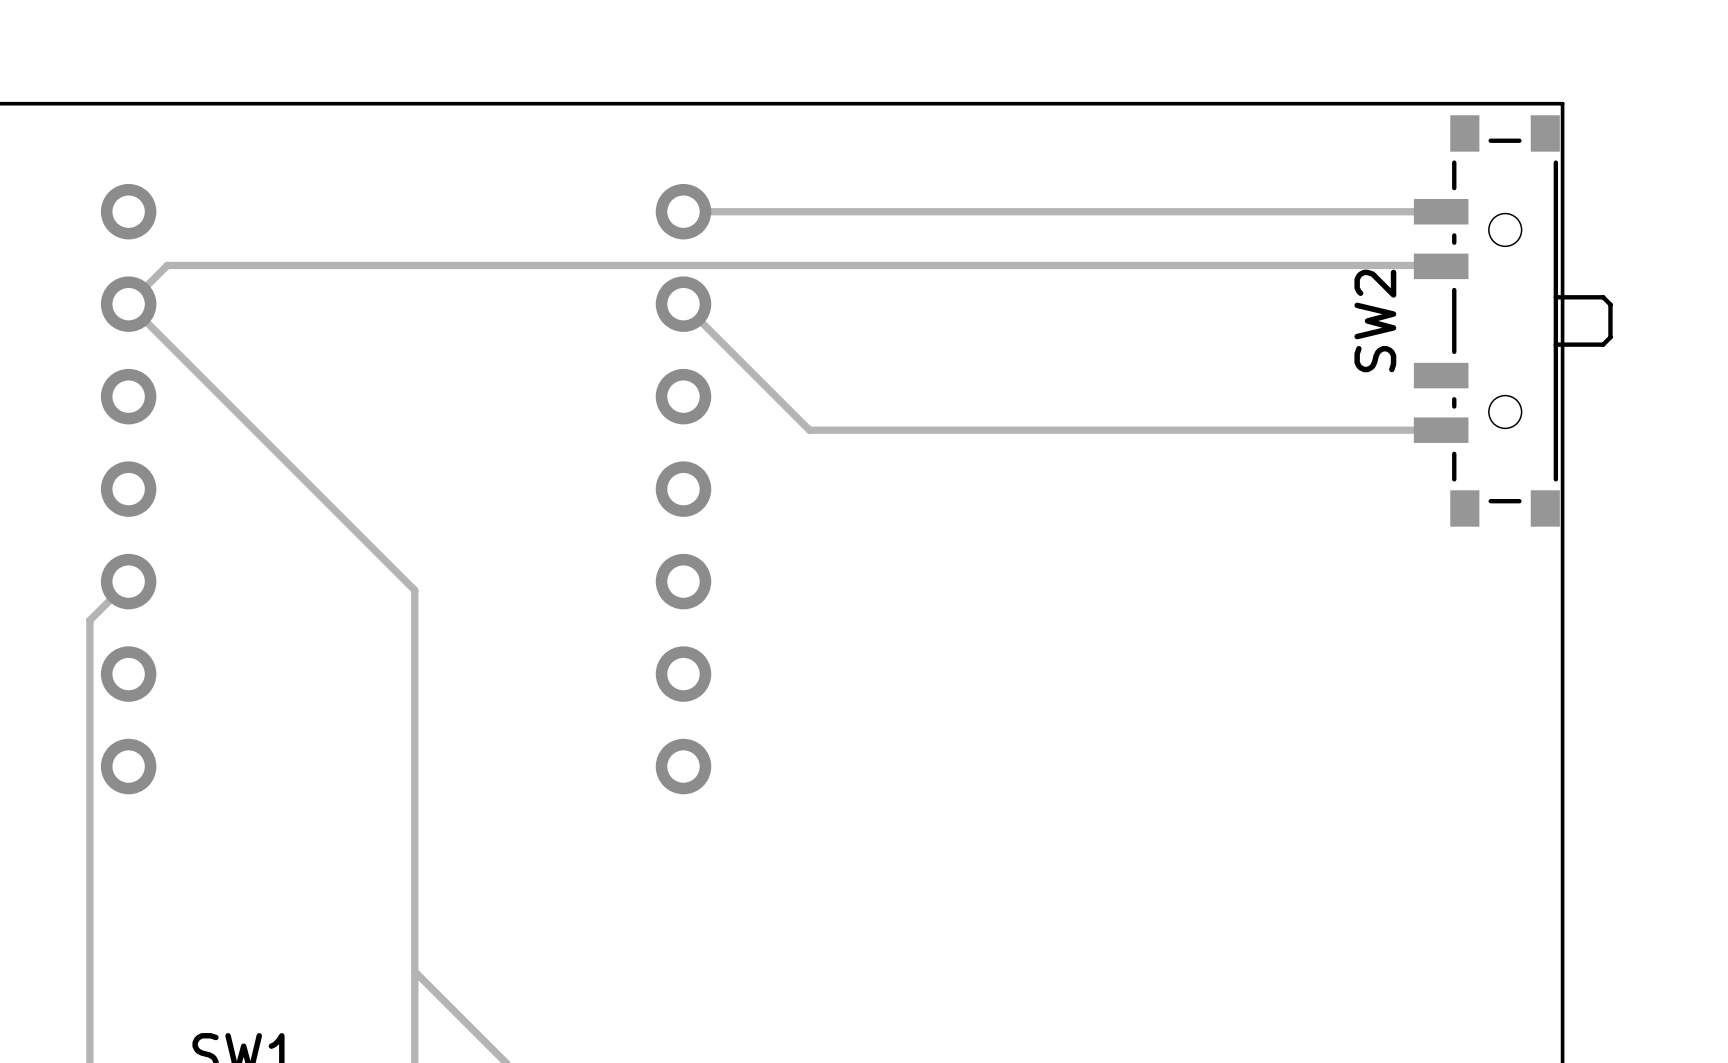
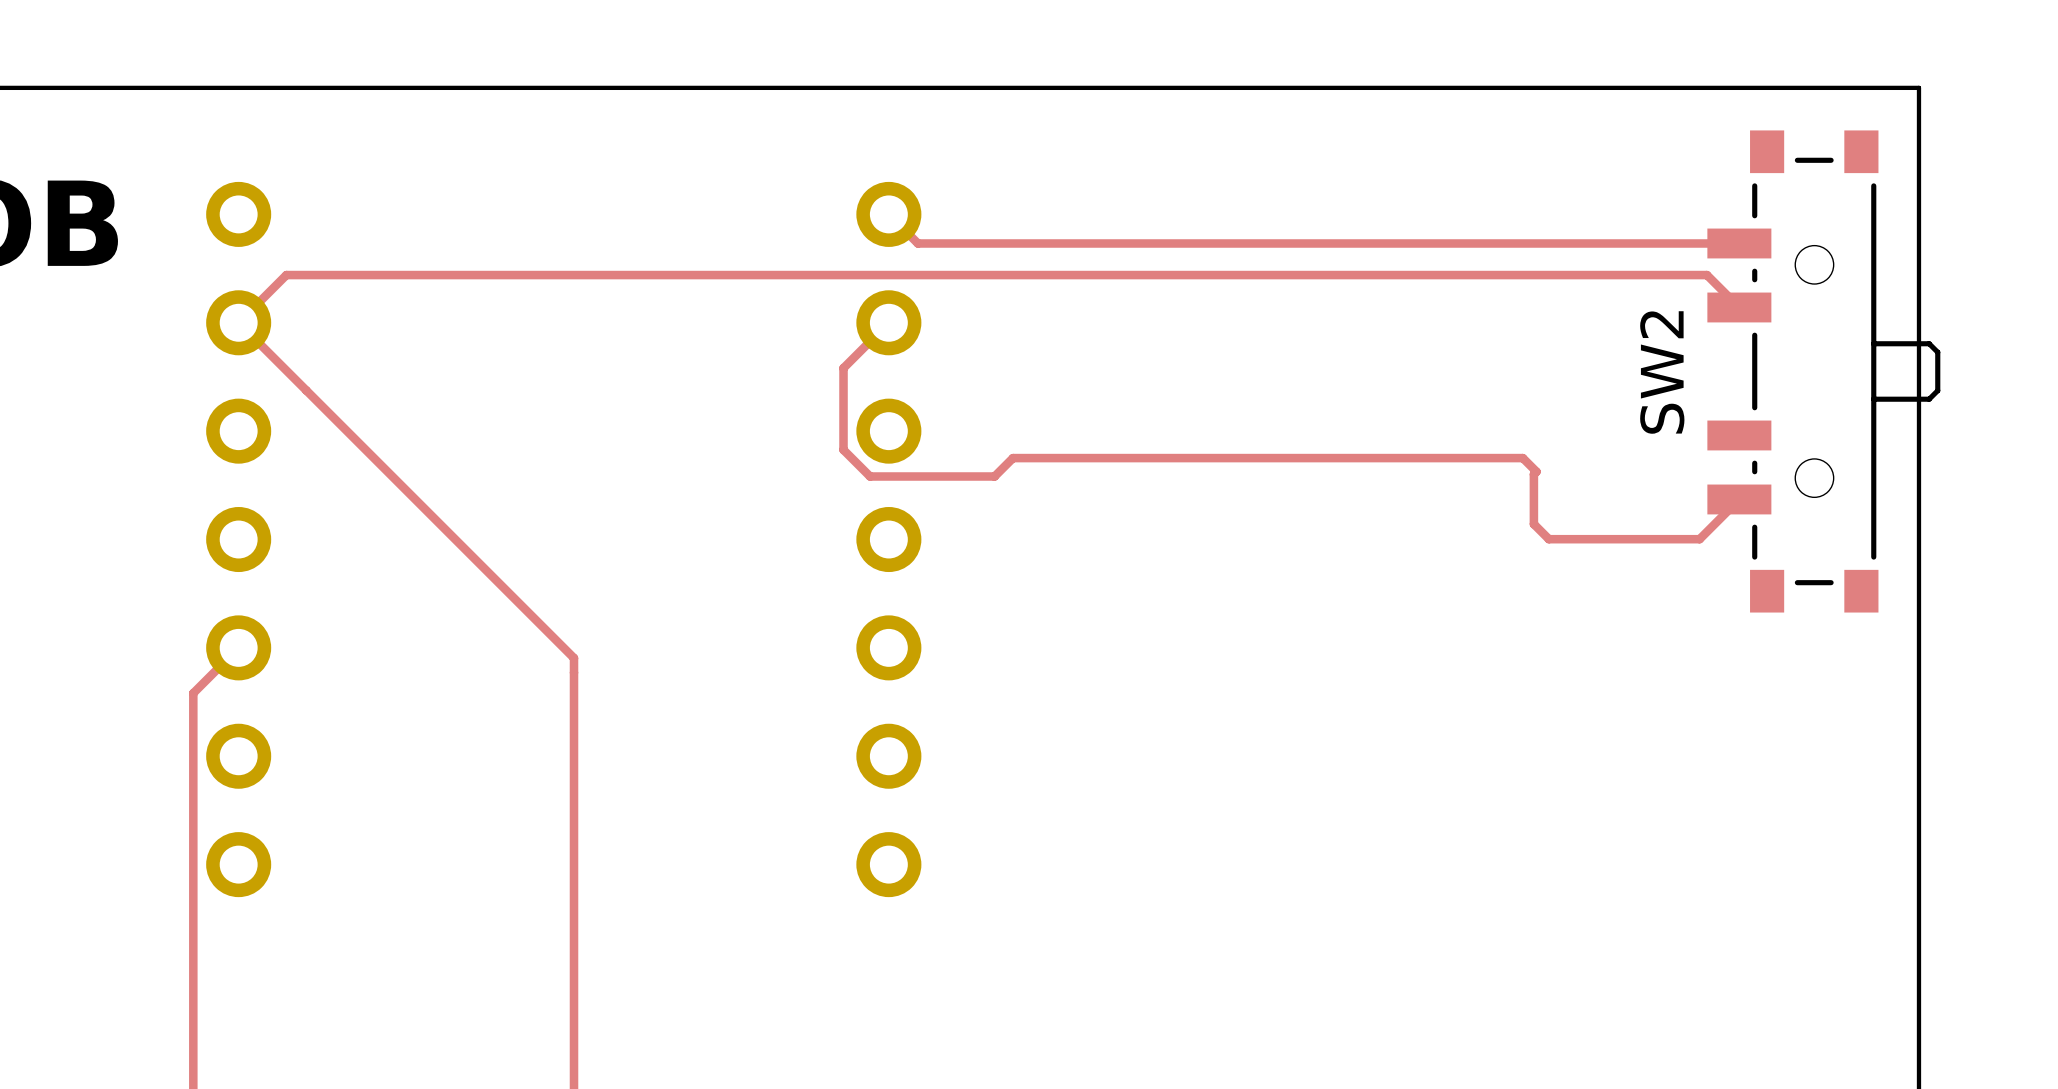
track: (683, 211) (1441, 211) -> (888, 214) (917, 243) (1739, 243)
track: (167, 265) (1441, 266) -> (284, 277) (286, 275) (1706, 275) (1739, 307)
track: (683, 304) (809, 430) (1441, 430) -> (888, 322) (843, 368) (843, 449) (870, 476) (994, 476) (1013, 458) (1522, 458) (1536, 471) (1533, 474) (1533, 524) (1548, 539) (1699, 539) (1739, 499)
SW2 position: (1513, 320) -> (1823, 371)

